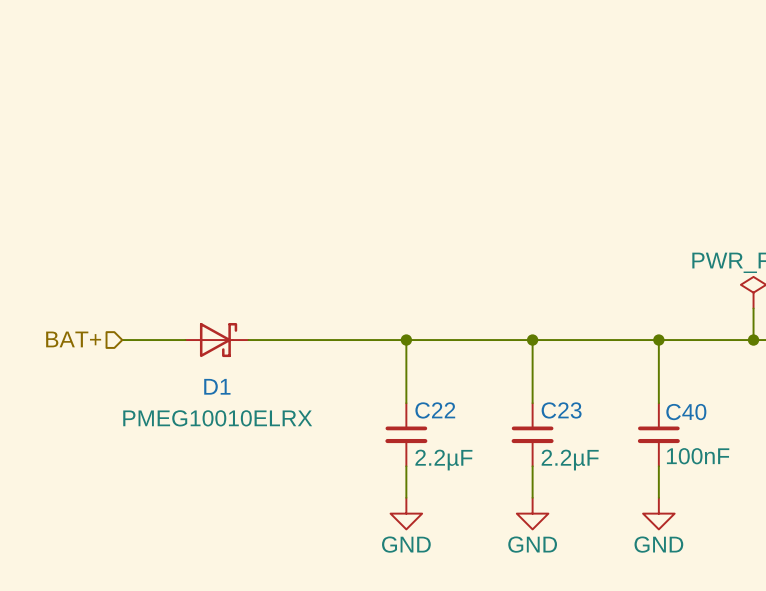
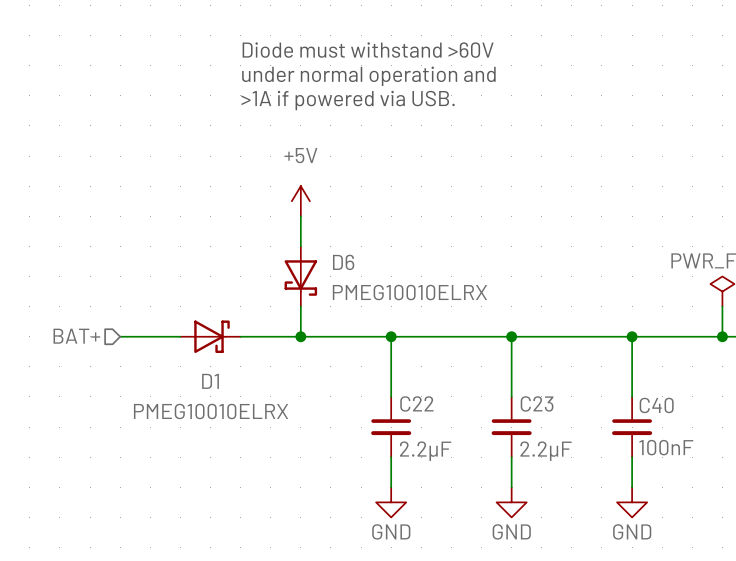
text: none -> Diode must withstand >60V (368, 50)
text: none -> under normal operation and (368, 76)
text: none -> >1A if powered via USB. (348, 100)
power symbol: none -> +5V (300, 201)
wire: none -> (300, 216) (300, 246)
D6: none -> PMEG10010ELRX (300, 276)
wire: none -> (300, 306) (300, 336)
junction: none -> (300, 336)

